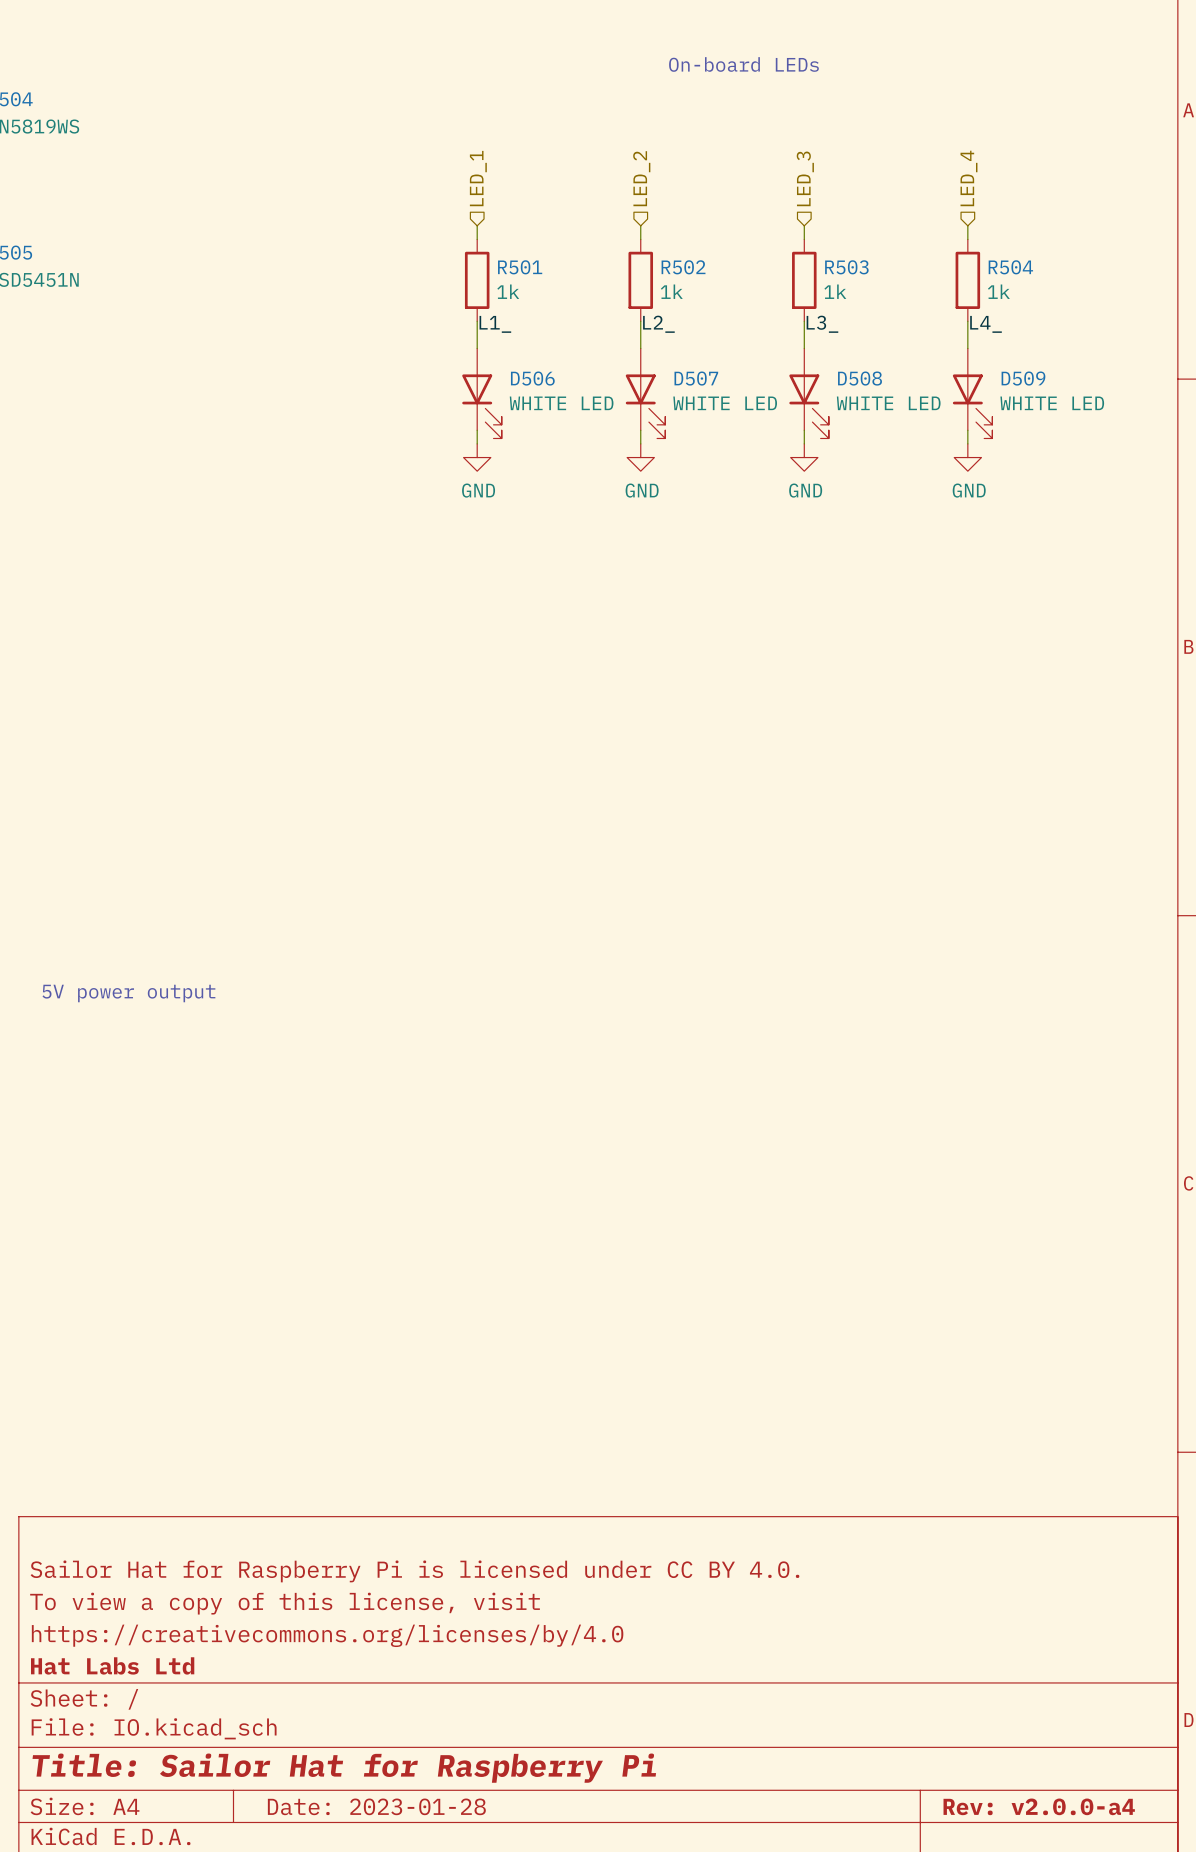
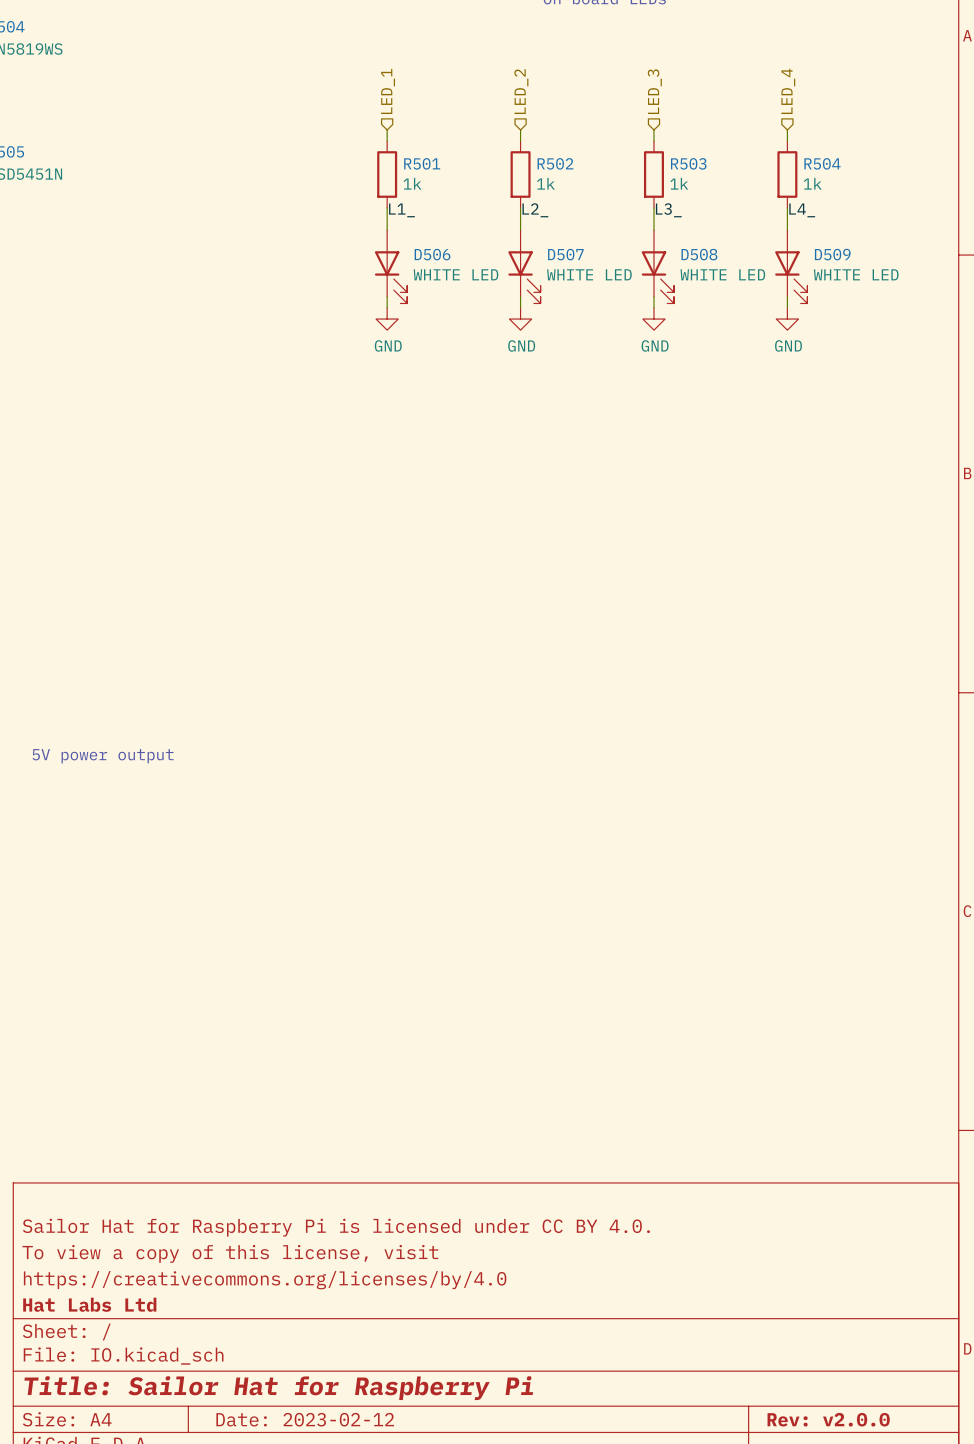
title block: Date: 2023-01-28 (376, 1806) -> Date: 2023-02-12 (305, 1419)
title block: Rev: v2.0.0-a4 (1039, 1806) -> Rev: v2.0.0 (828, 1419)

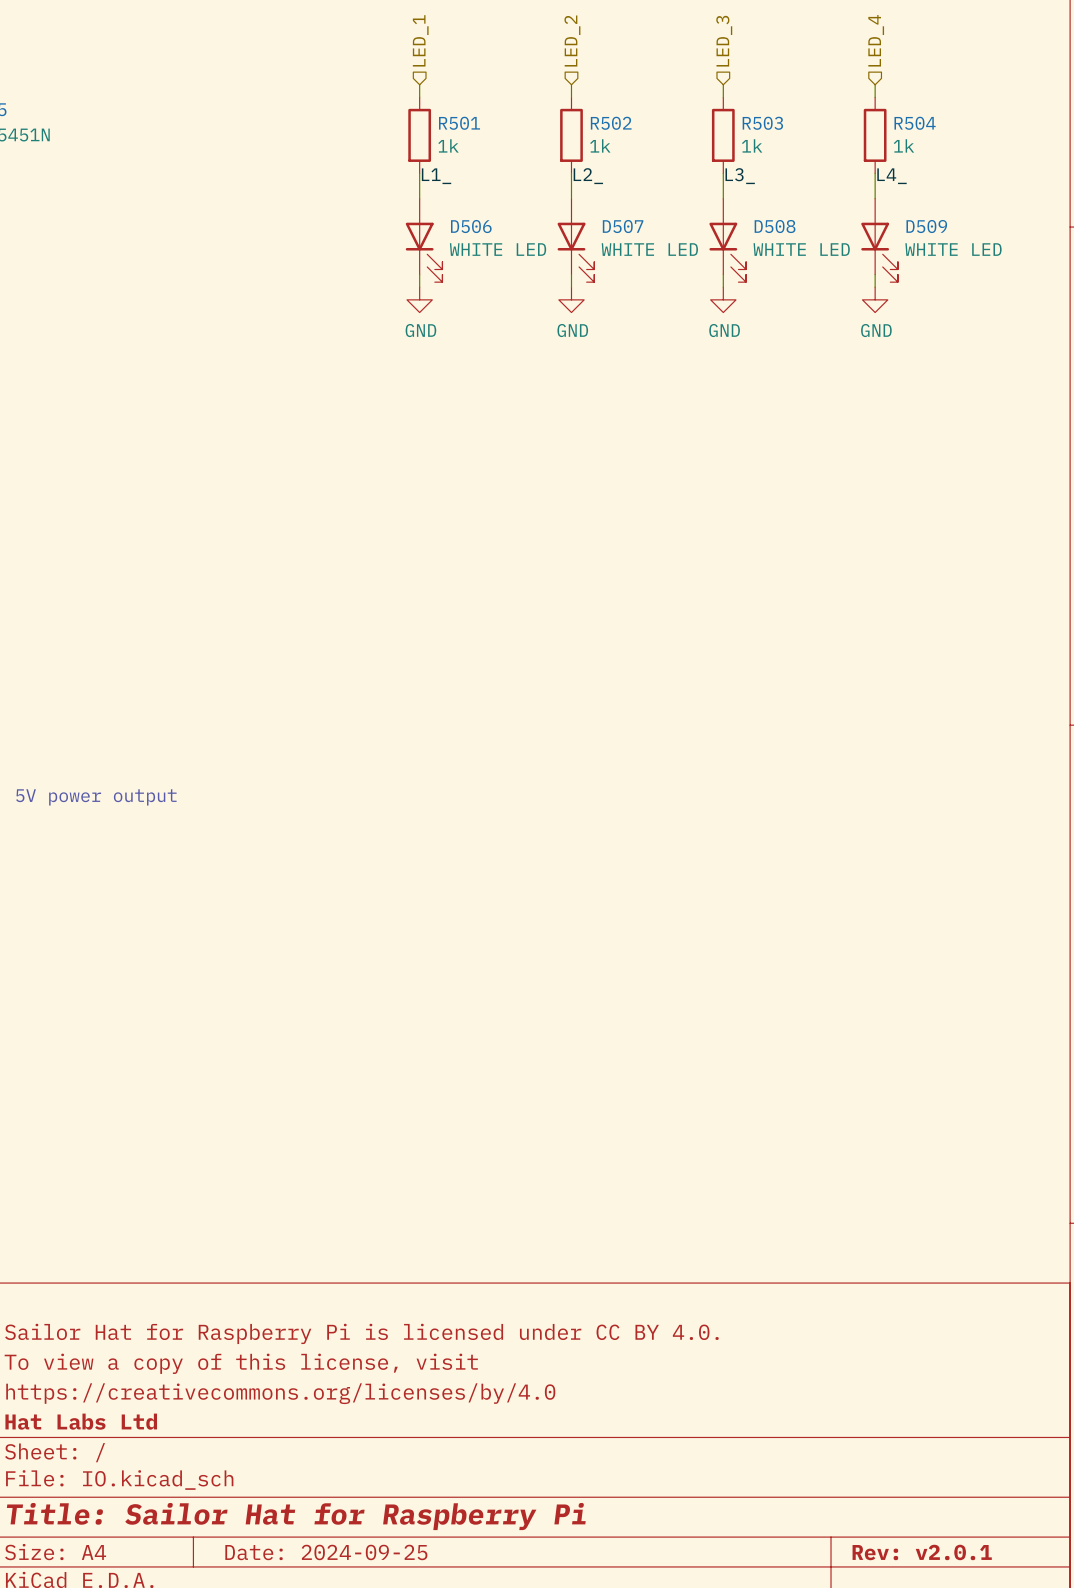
title block: Date: 2023-02-12 (305, 1419) -> Date: 2024-09-25 (326, 1552)
title block: Rev: v2.0.0 (828, 1419) -> Rev: v2.0.1 (922, 1552)

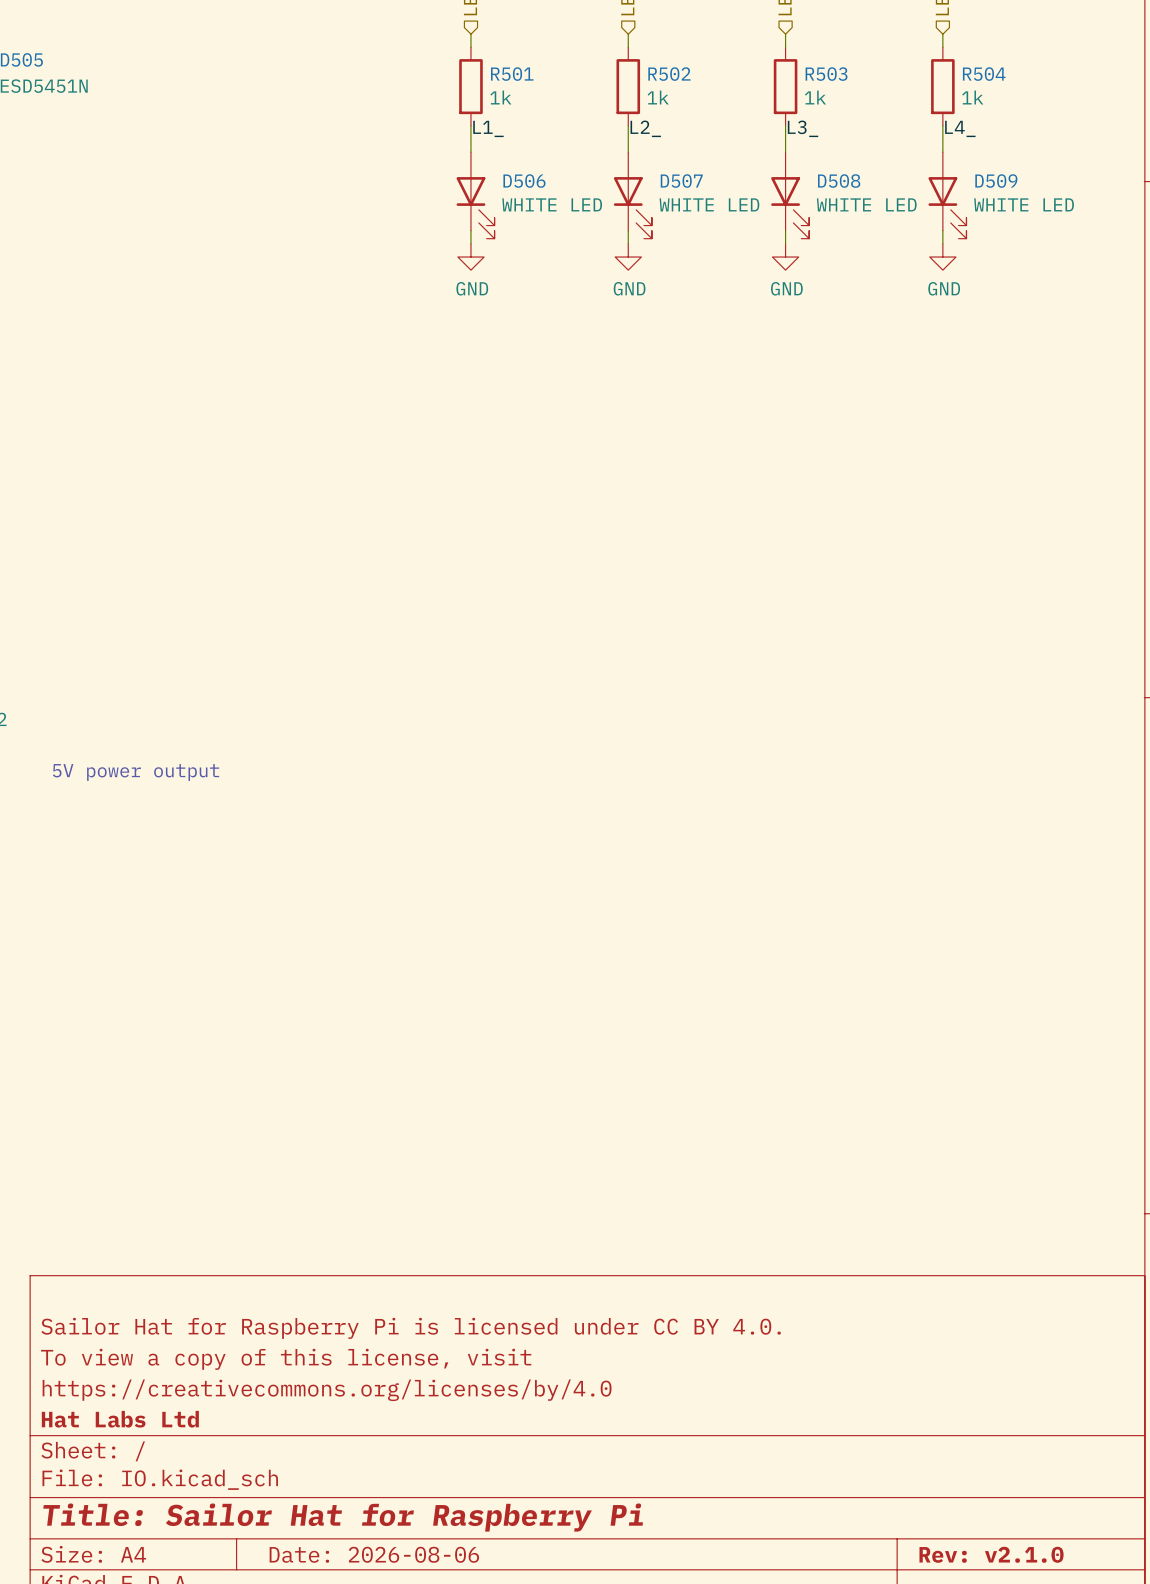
title block: Date: 2024-09-25 (326, 1552) -> Date: 2026-08-06 (374, 1554)
title block: Rev: v2.0.1 (922, 1552) -> Rev: v2.1.0 (991, 1554)

